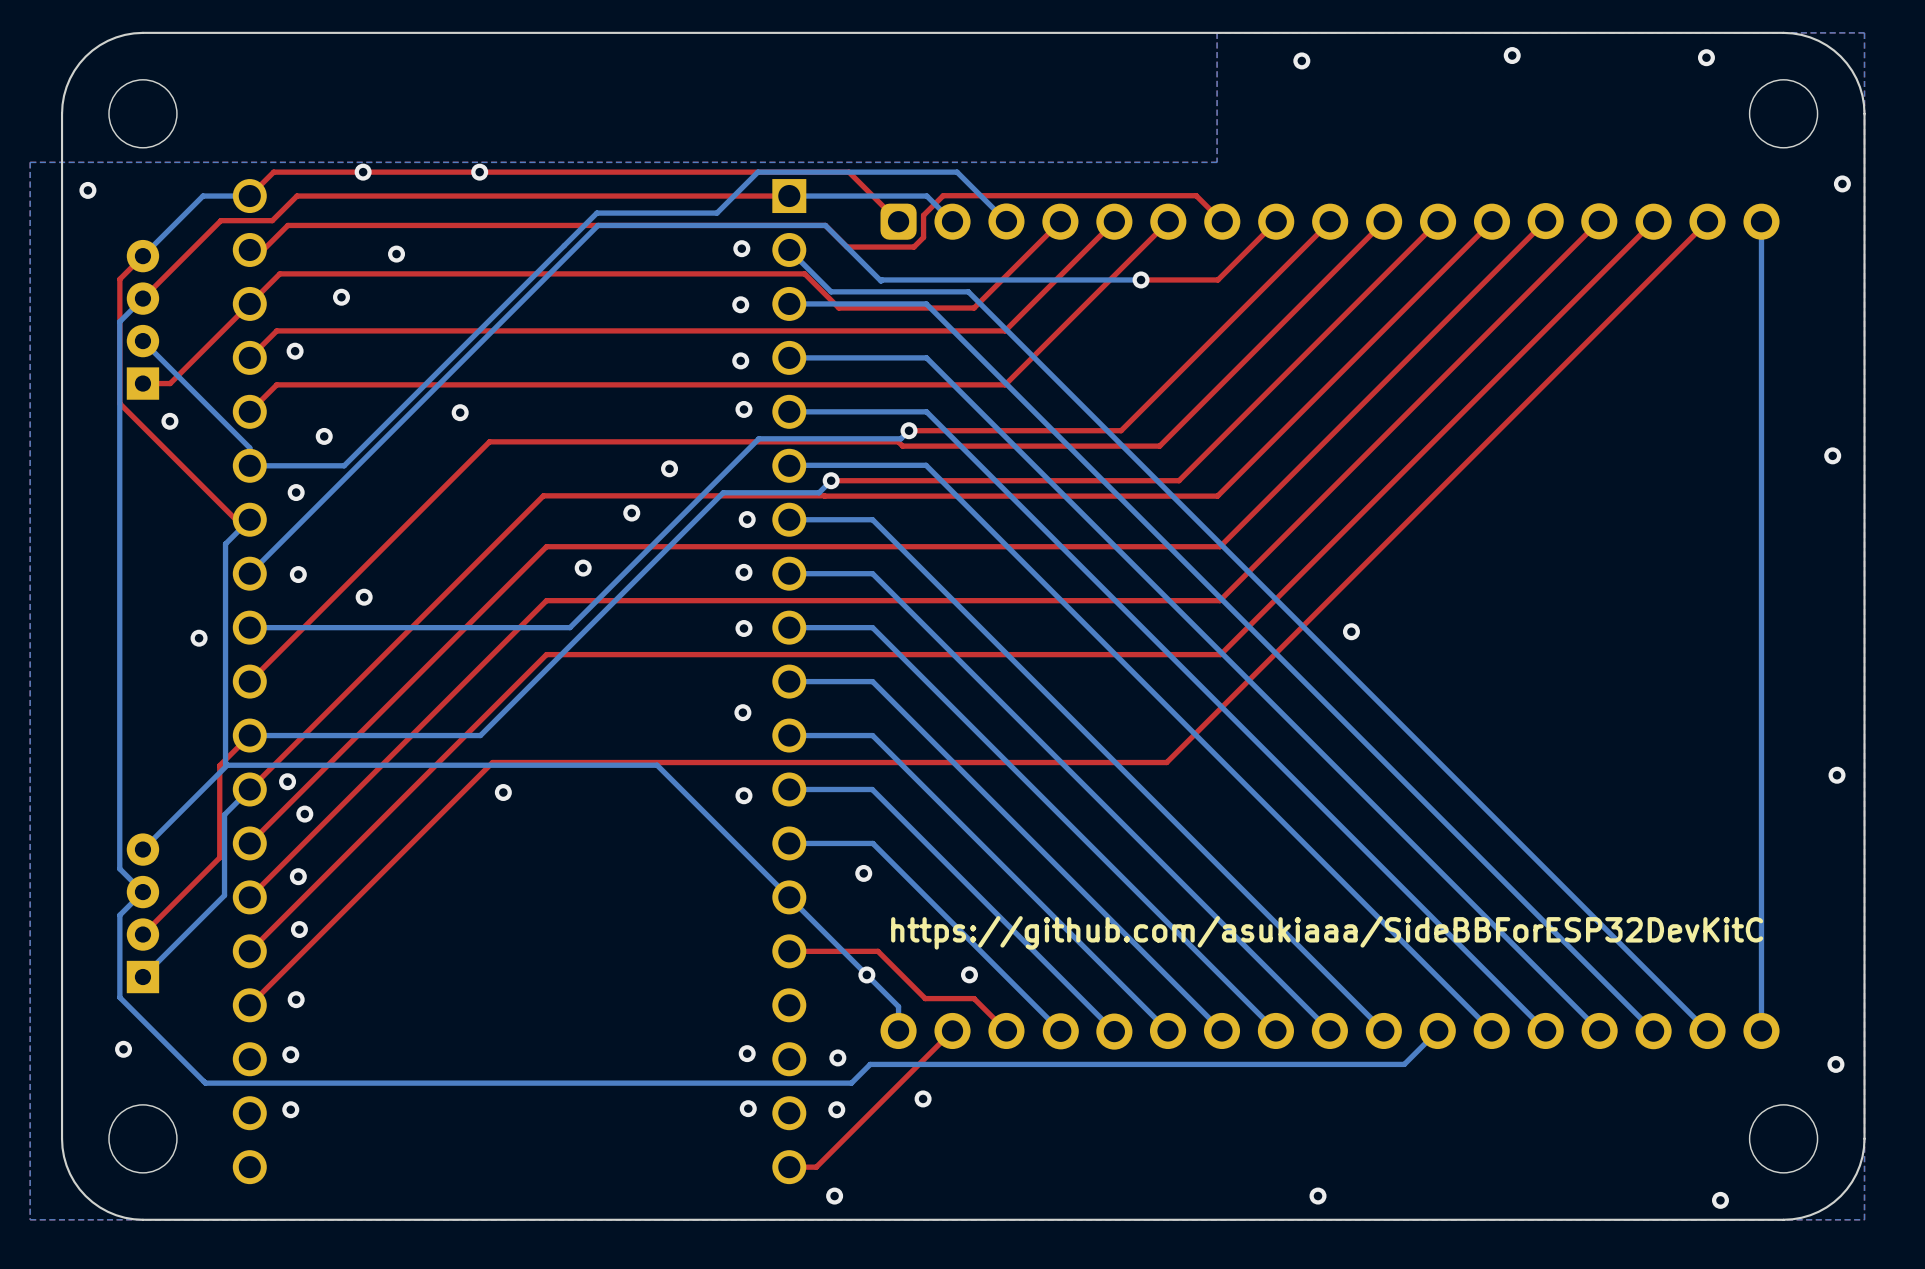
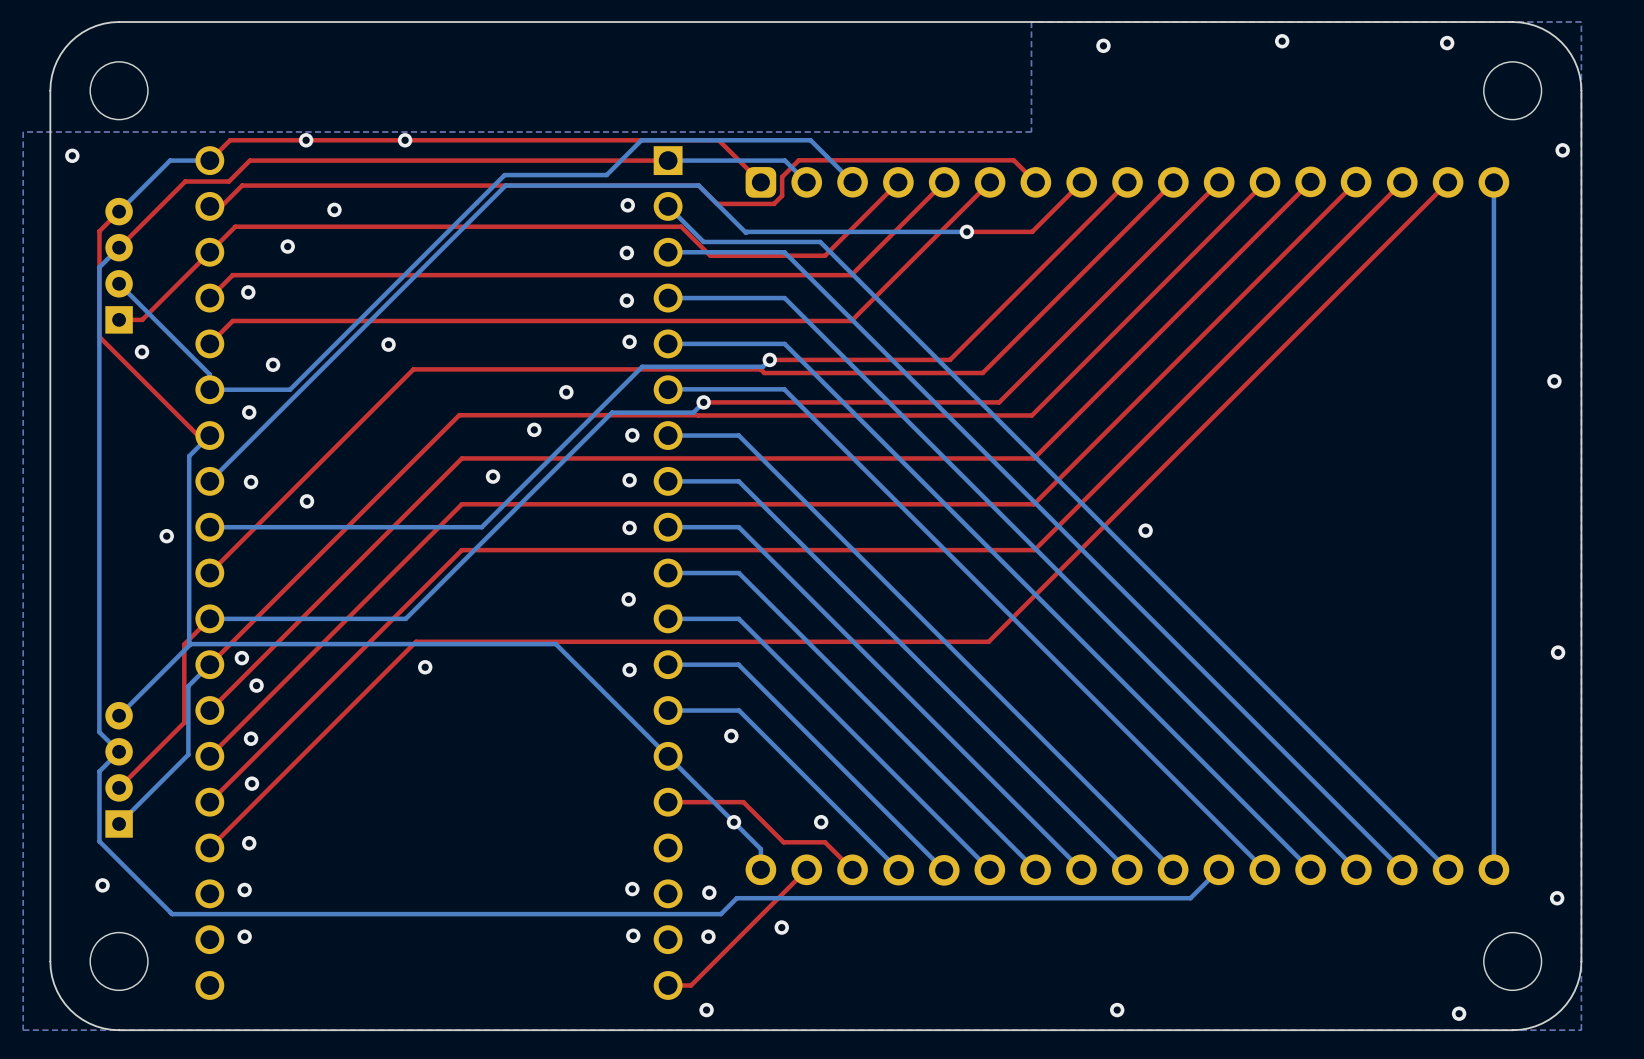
text: https://github.com/asukiaaa/SideBBForESP32DevKitC (1327, 932) -> none

